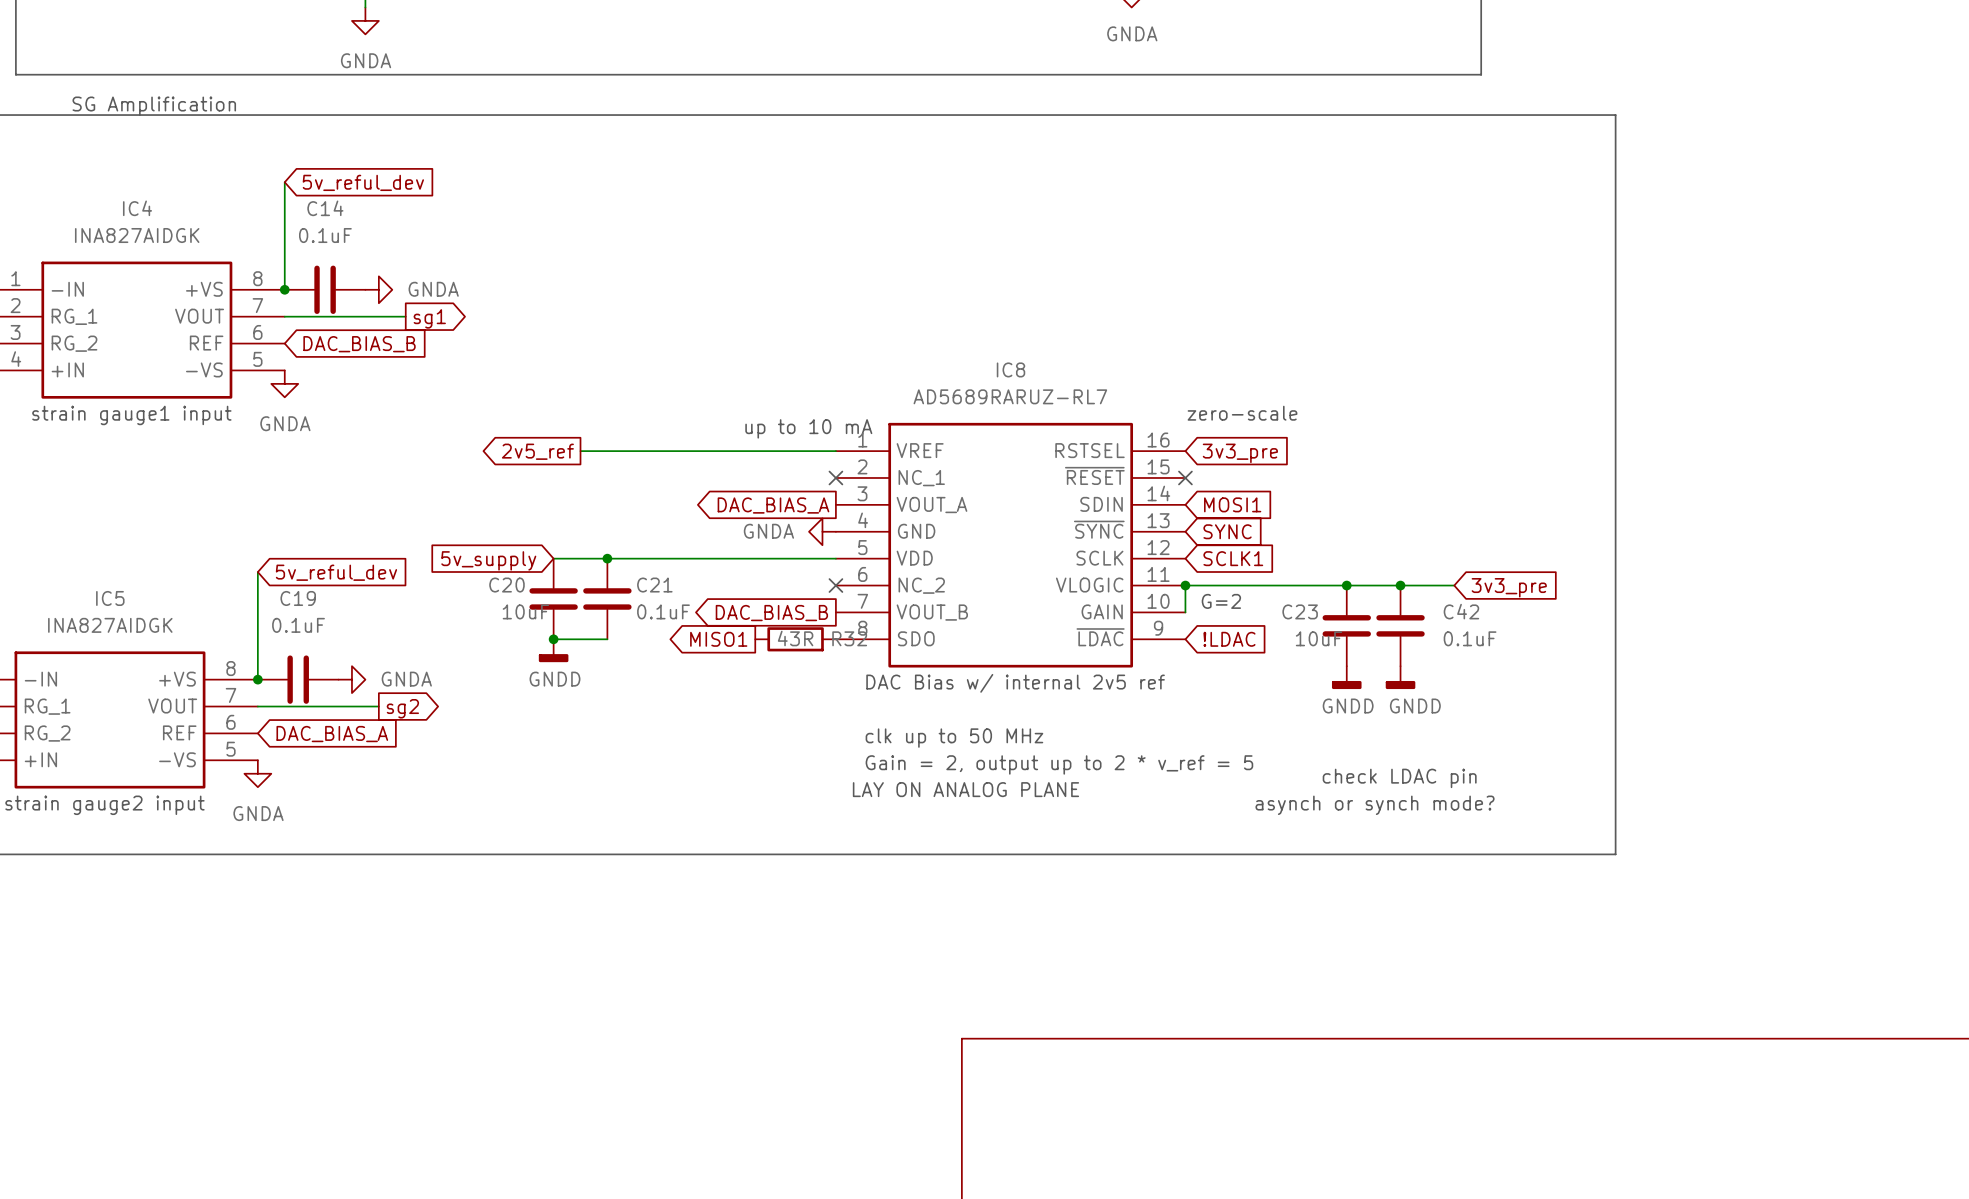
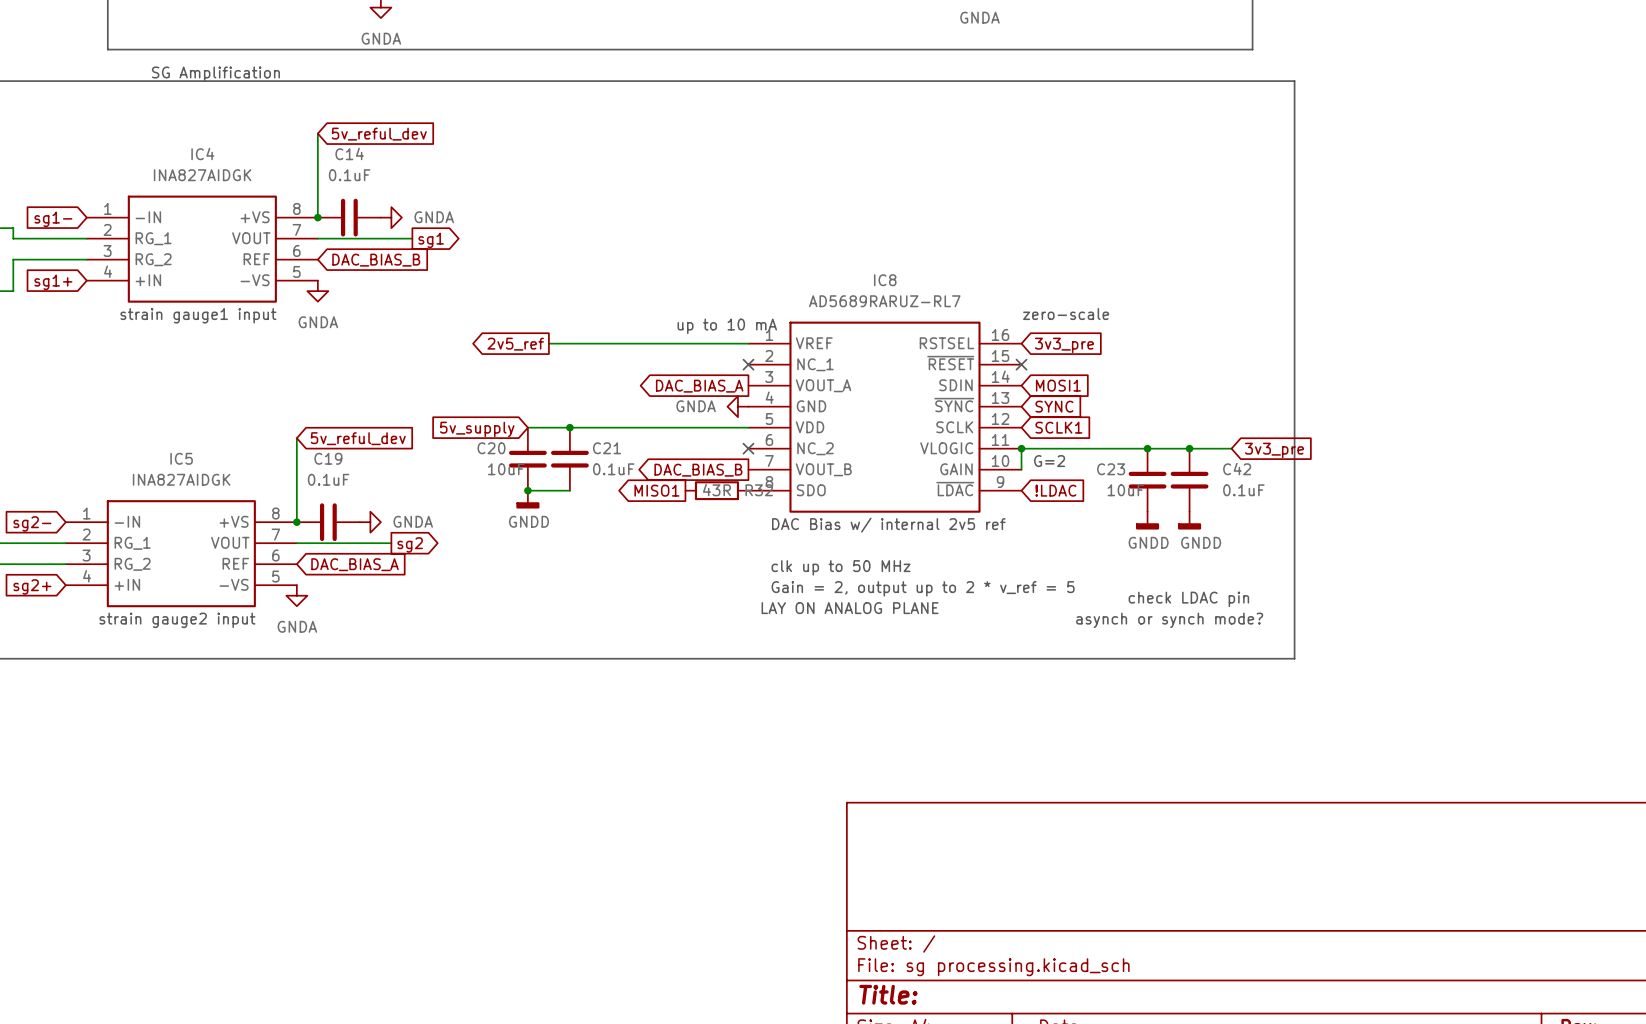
line: (1534, 115) (1615, 115) (1615, 854) (1534, 854) -> (1294, 81) (1294, 658)

